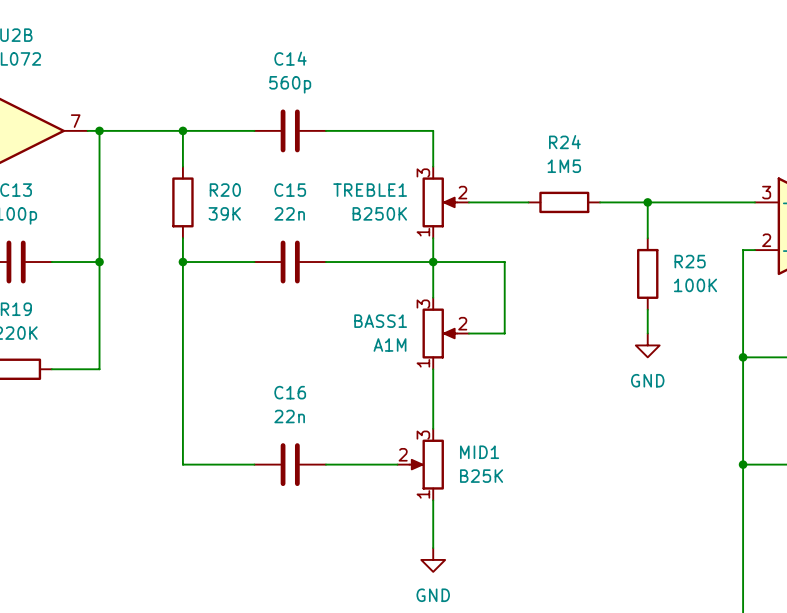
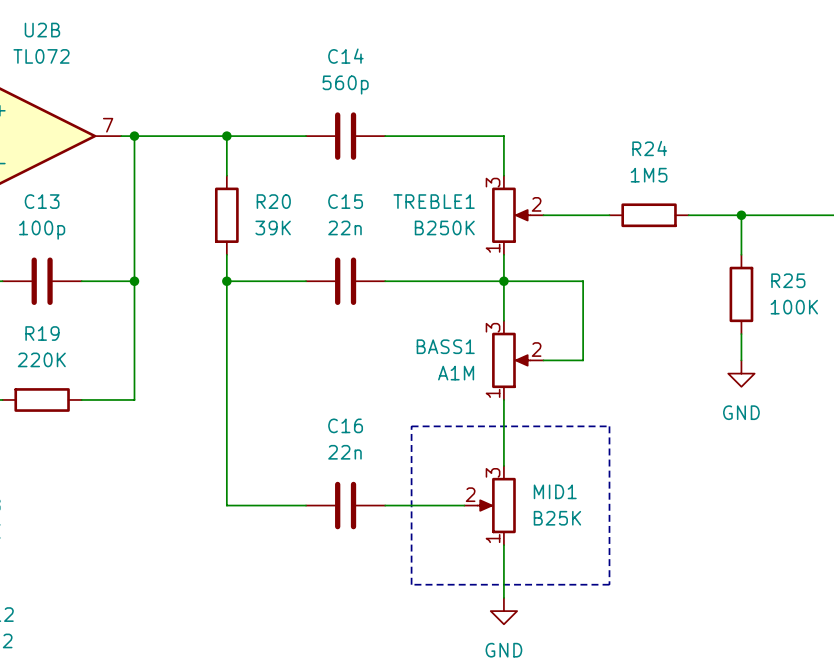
line: none -> (411, 426) (609, 426) (609, 584) (411, 584) (411, 426)

